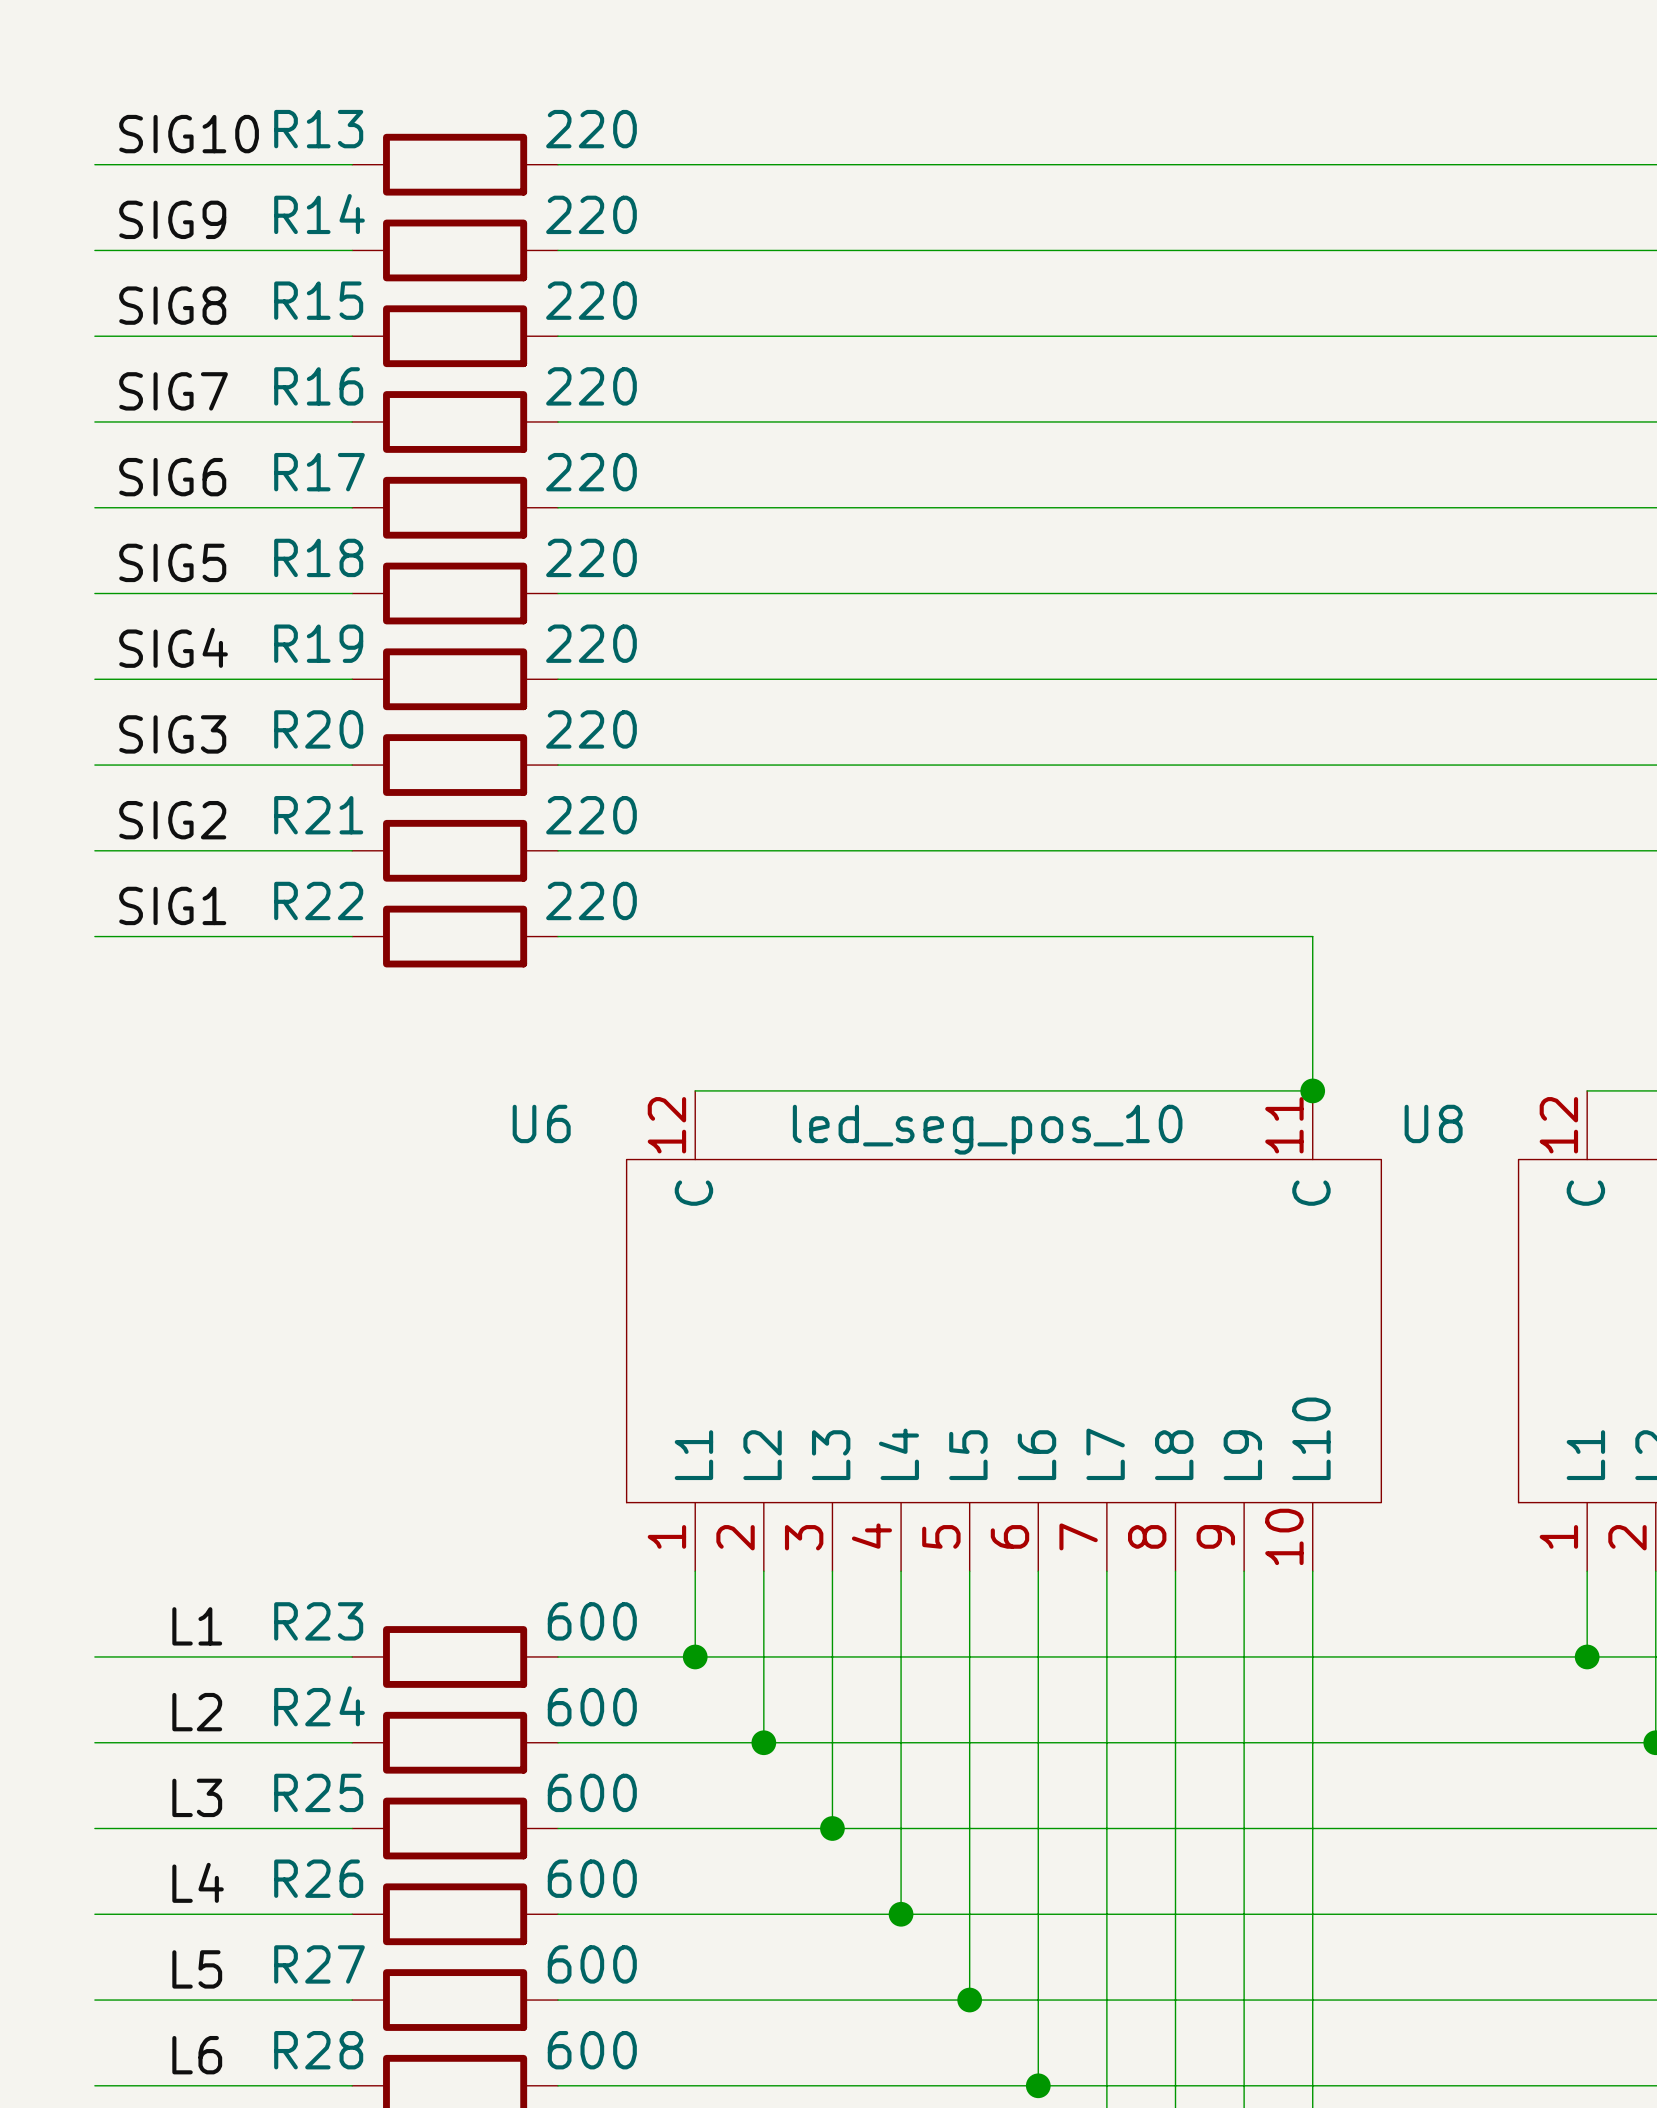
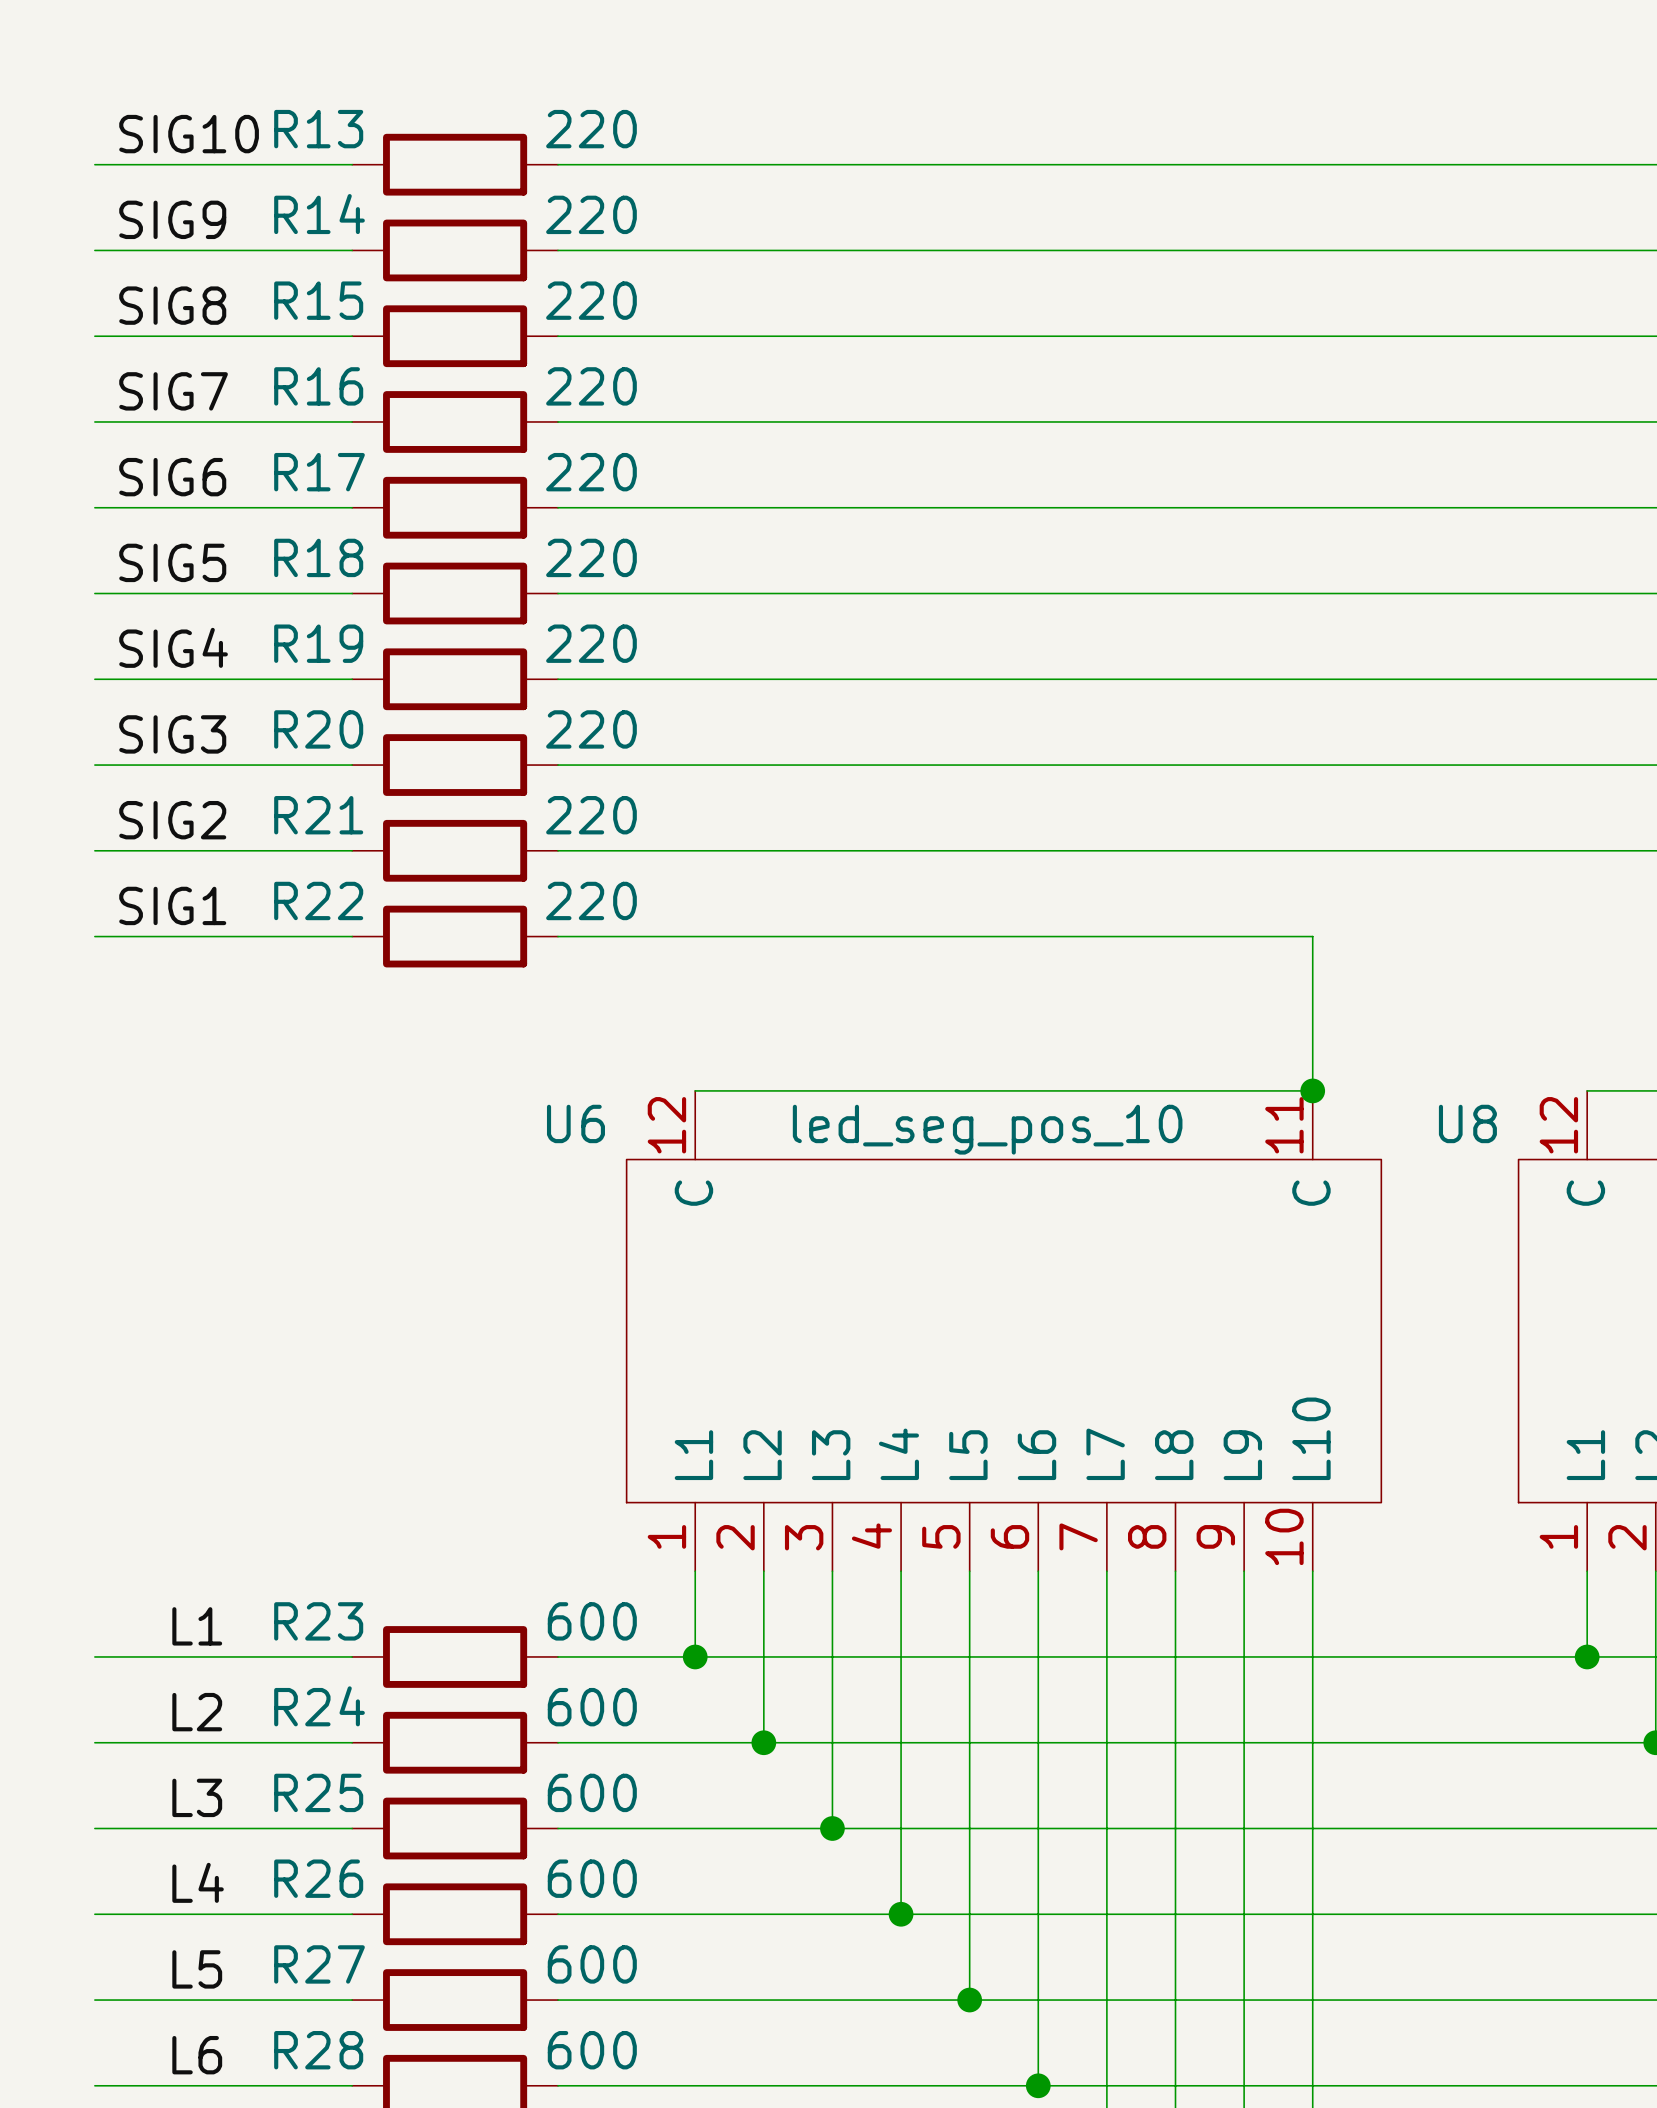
U6 name position: U6 (541, 1123) -> U6 (575, 1123)
U8 name position: U8 (1433, 1123) -> U8 (1467, 1123)

